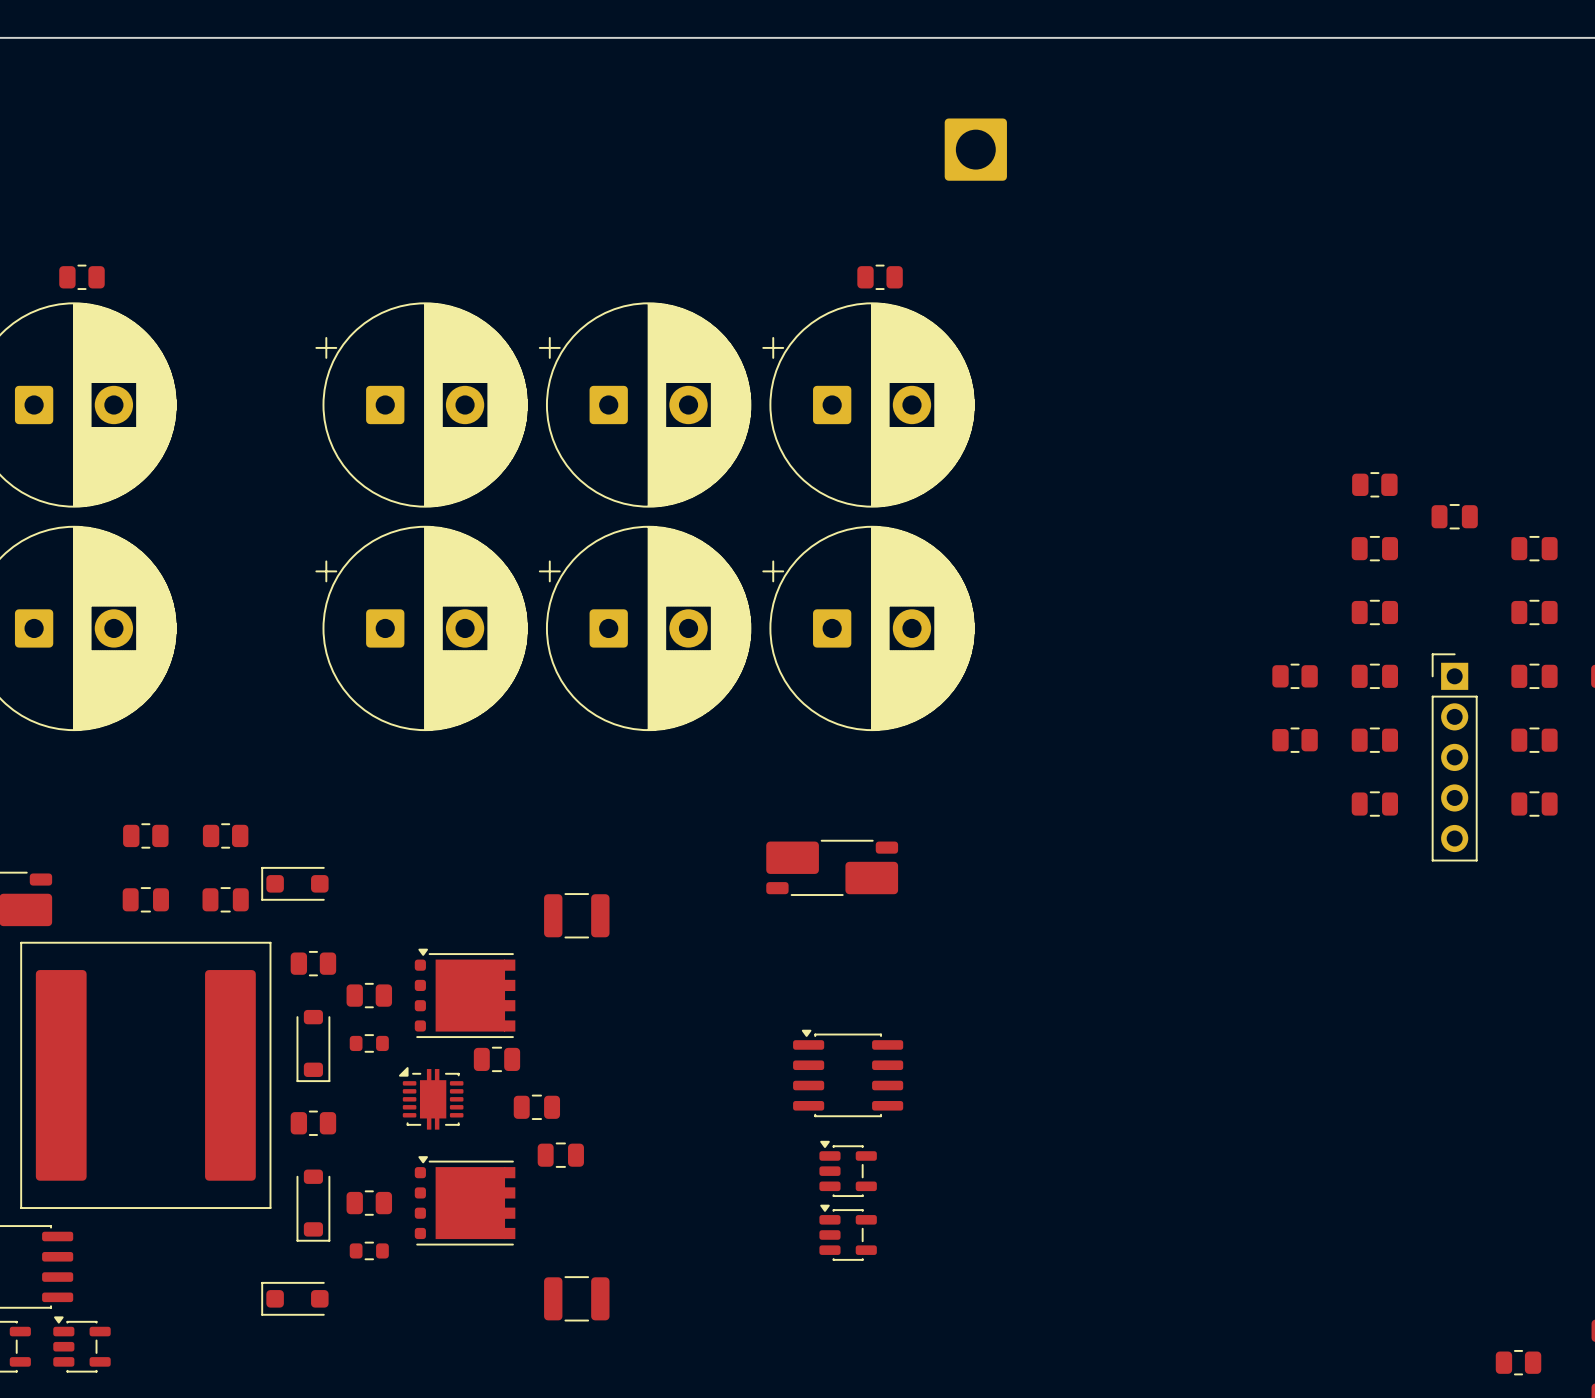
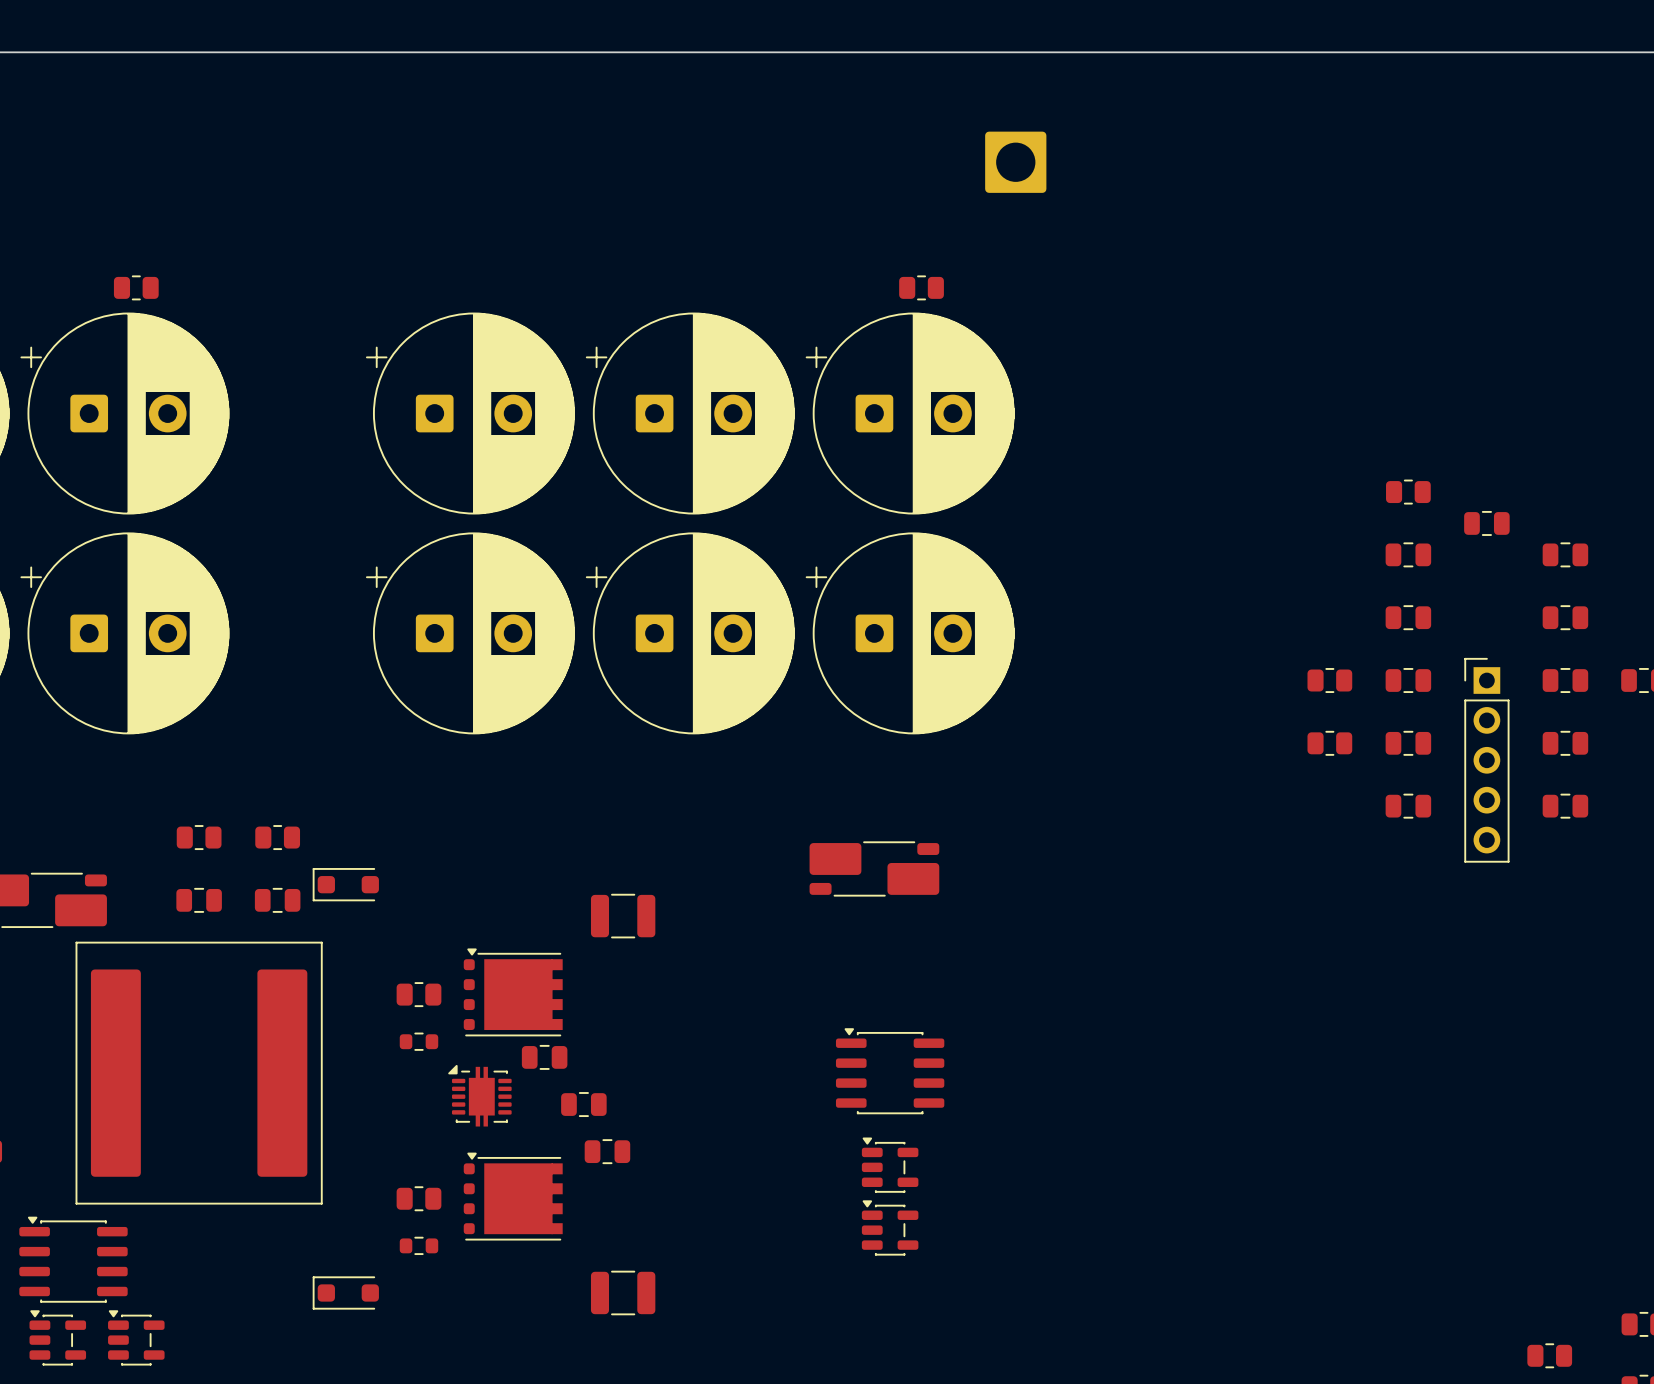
part: (313, 963) -> none
part: (313, 1046) -> none
part: (313, 1123) -> none
part: (313, 1205) -> none

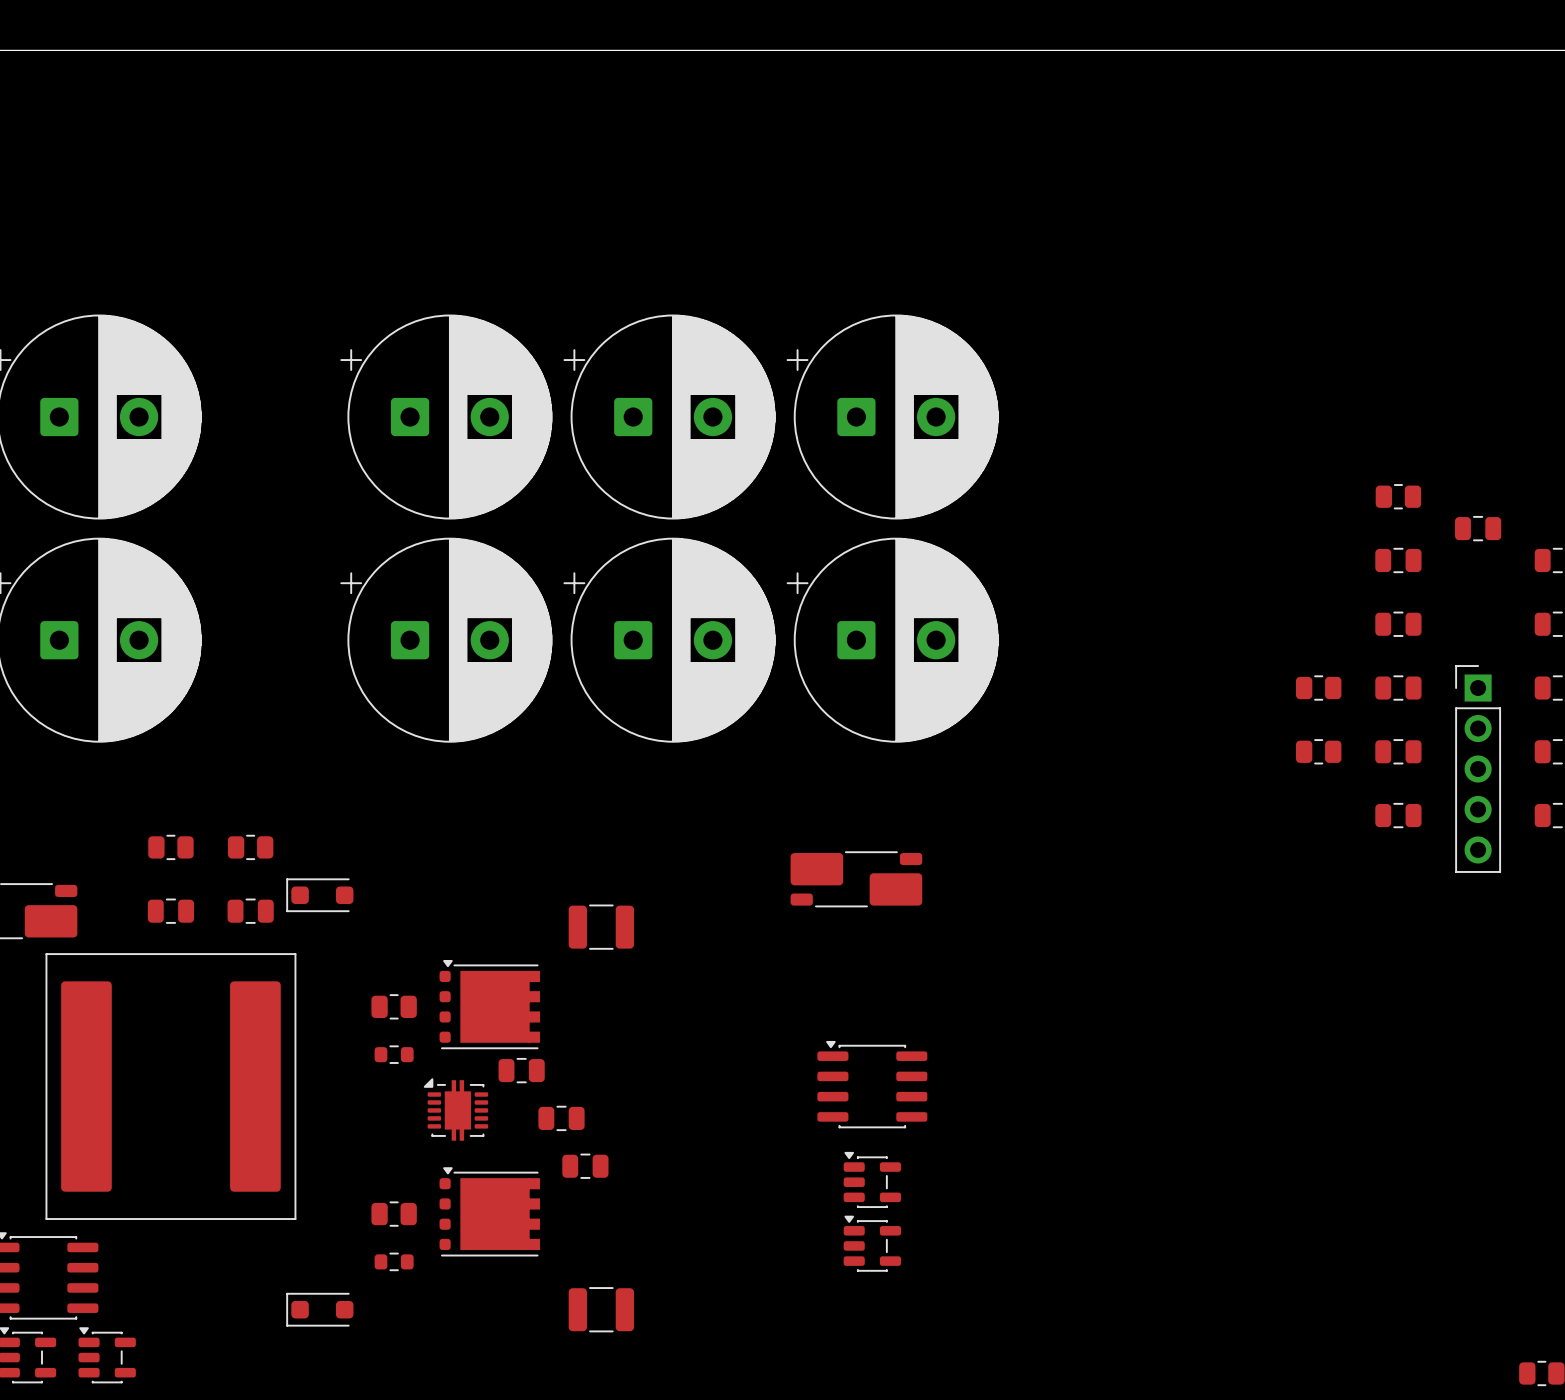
part: (1015, 162) -> none
part: (136, 287) -> none
part: (921, 287) -> none

